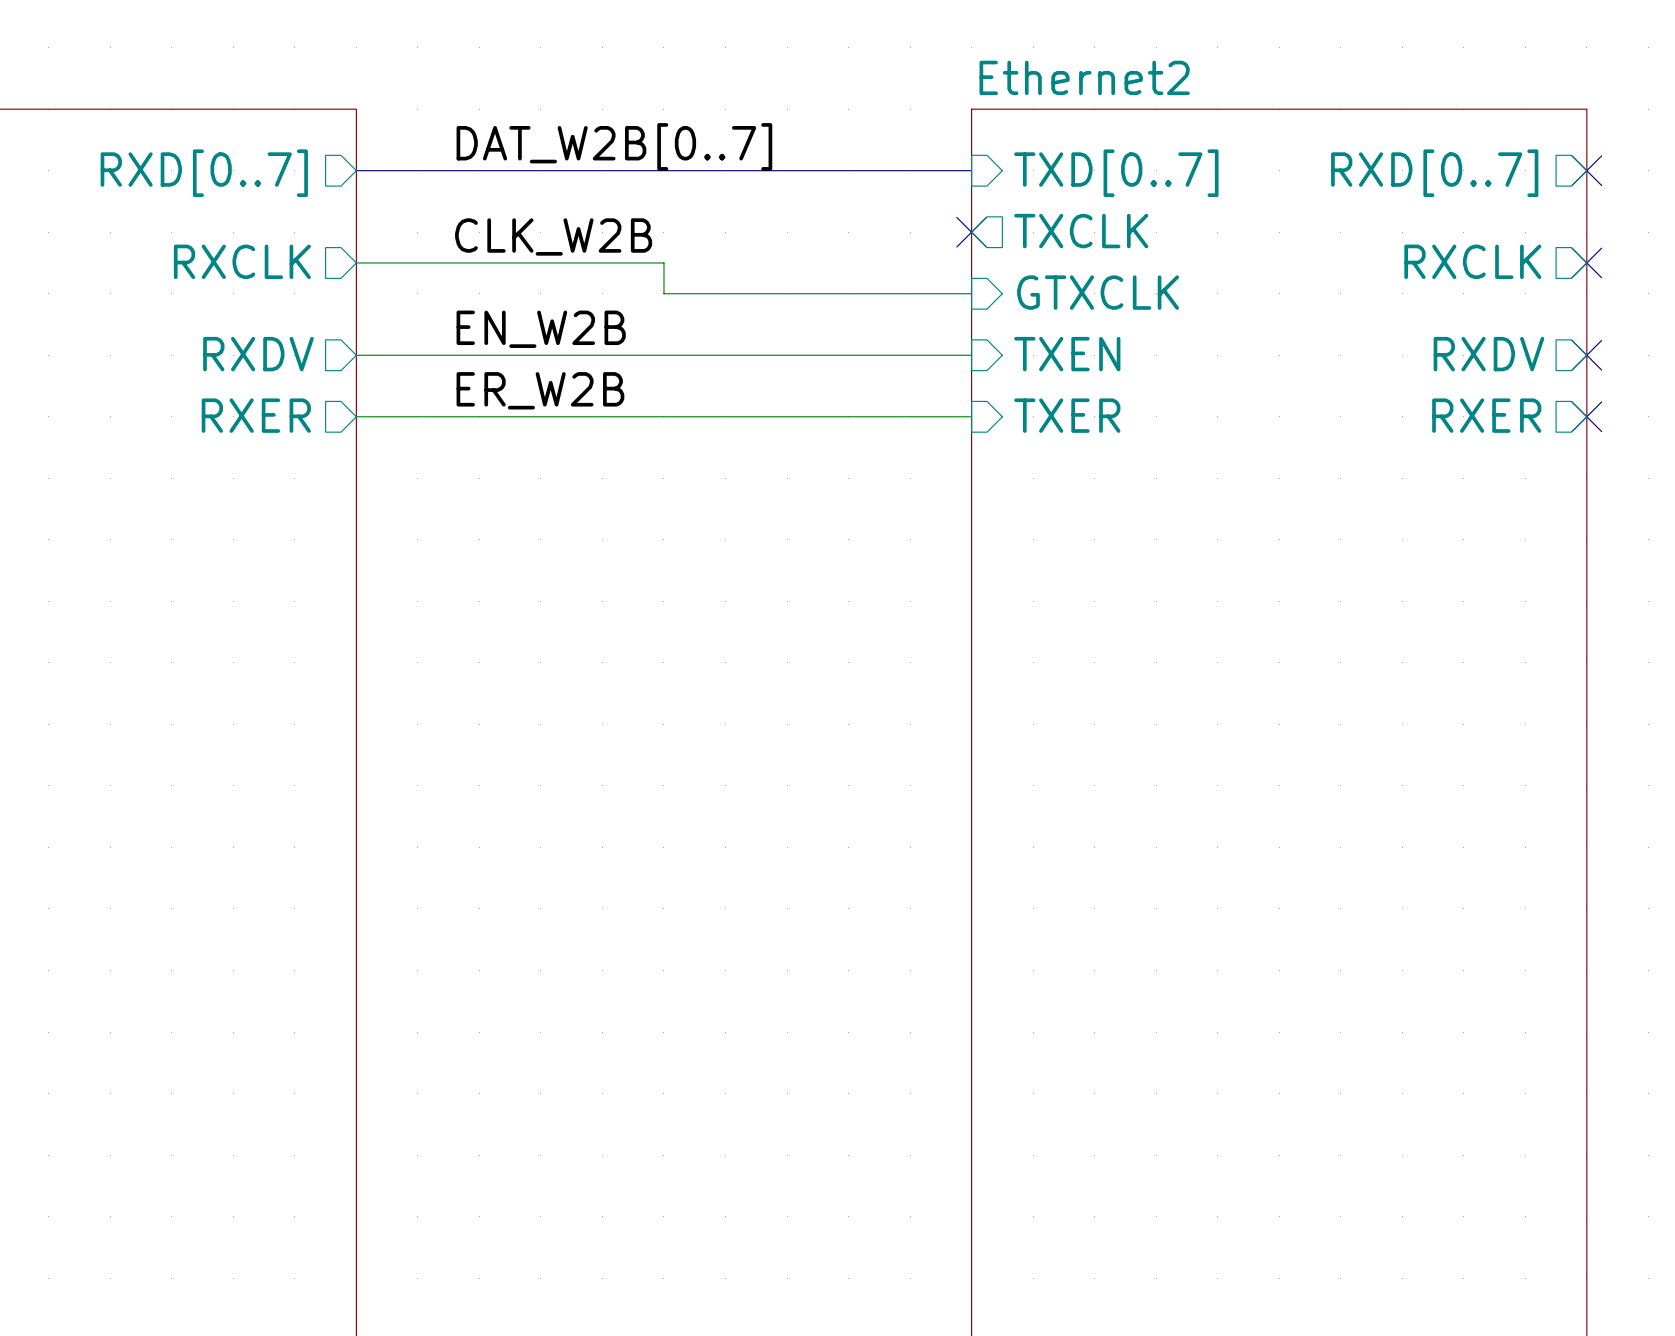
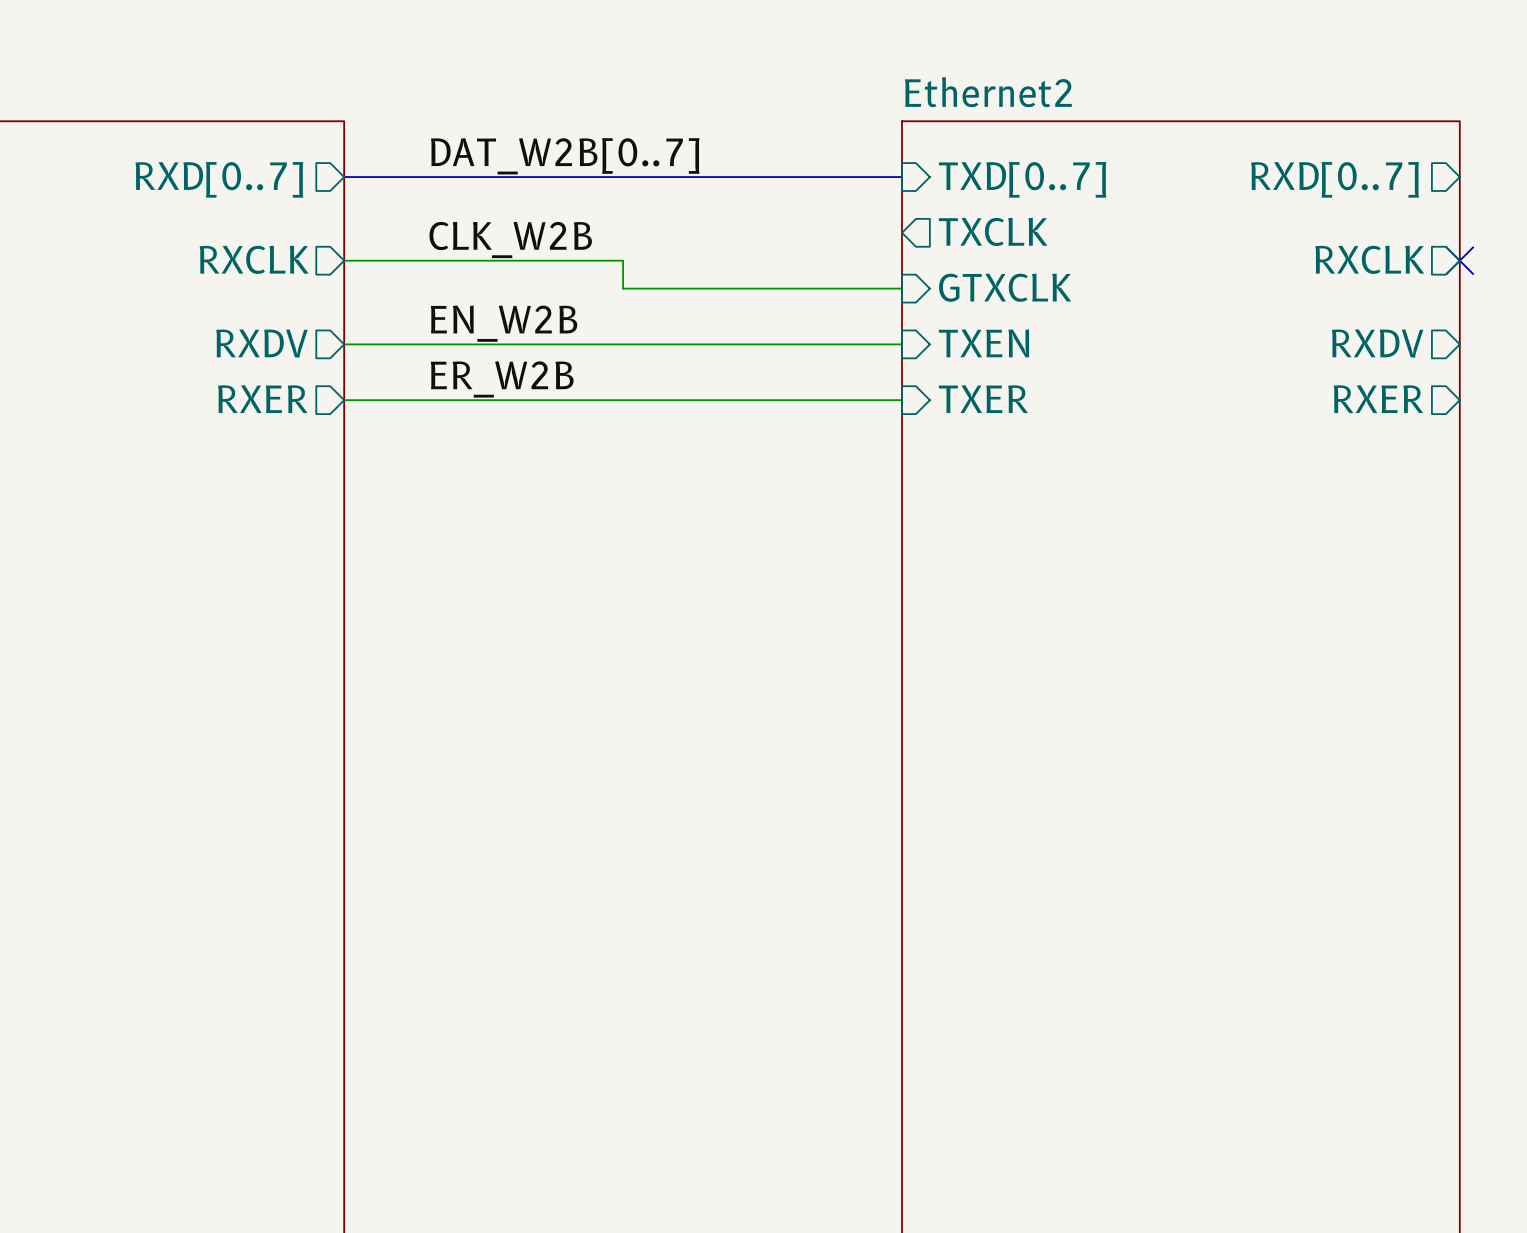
no-connect mark: (1586, 170) -> none
no-connect mark: (971, 232) -> none
no-connect mark: (1586, 355) -> none
no-connect mark: (1586, 416) -> none

